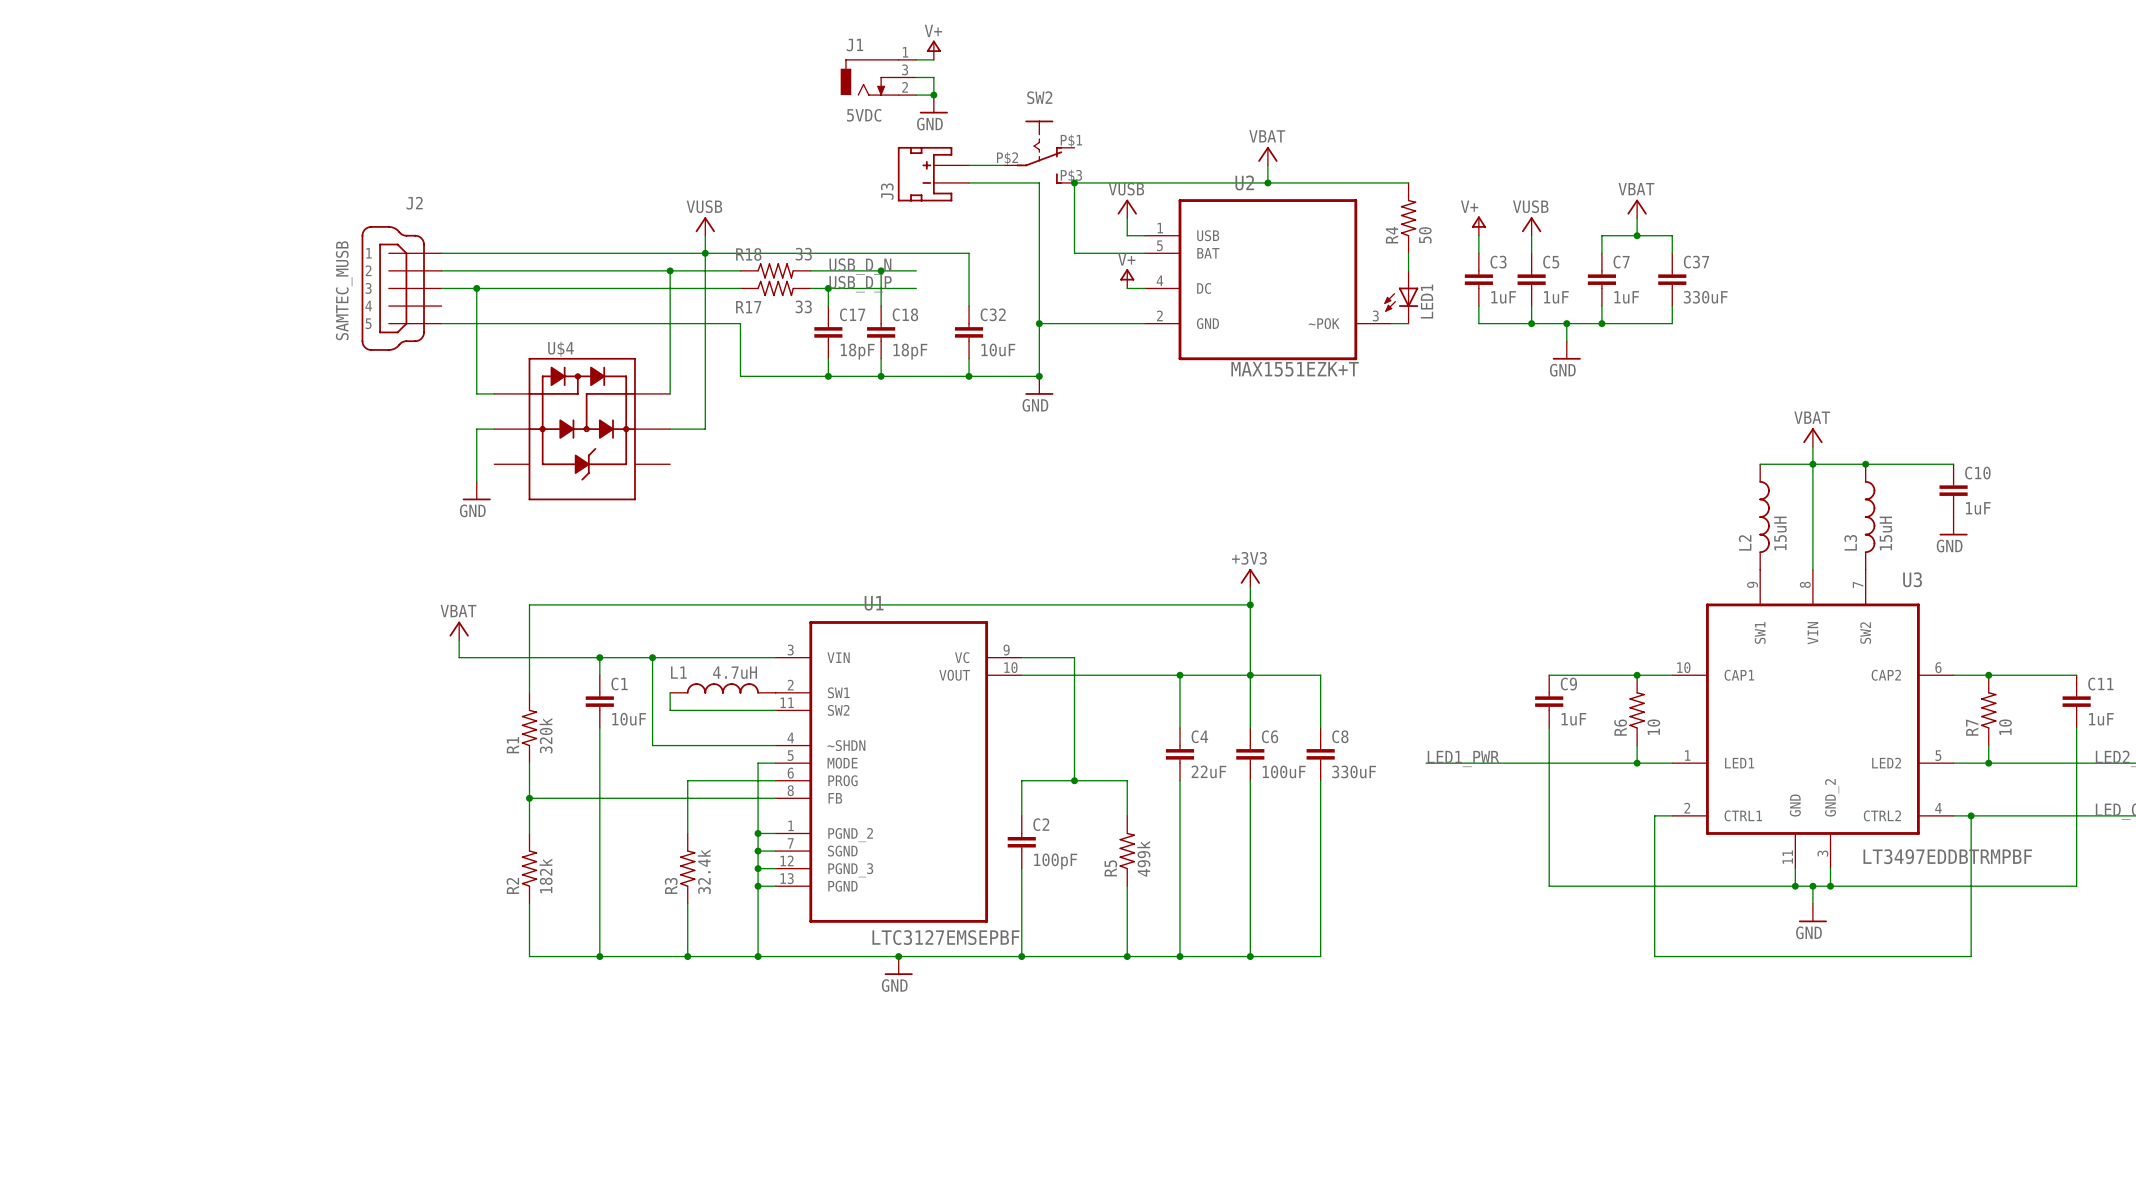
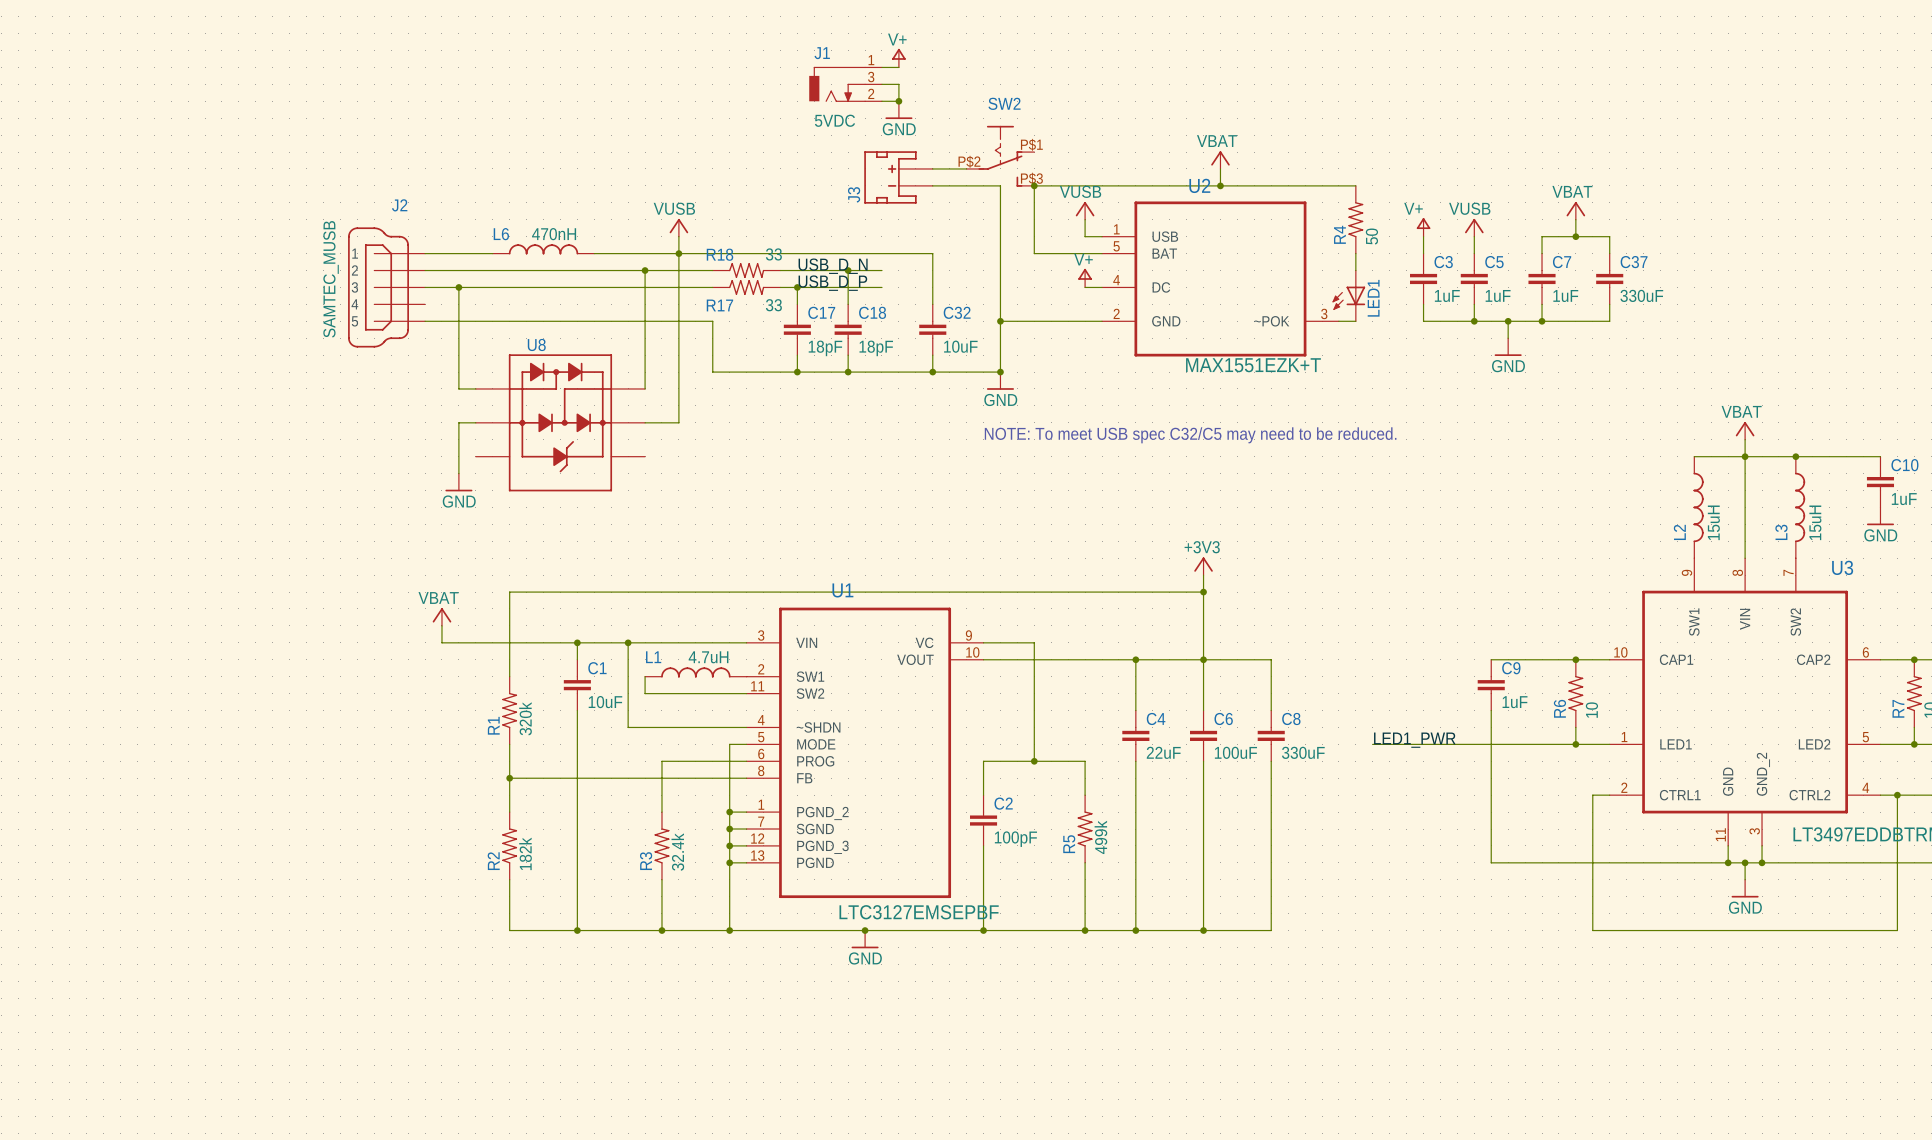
L6: none -> 470nH (543, 249)
wire: (511, 253) (617, 253) -> none
U$4 name: U$4 (560, 349) -> U8 (536, 344)
text: none -> NOTE: To meet USB spec C32/C5 may need to be reduced. (1190, 435)

